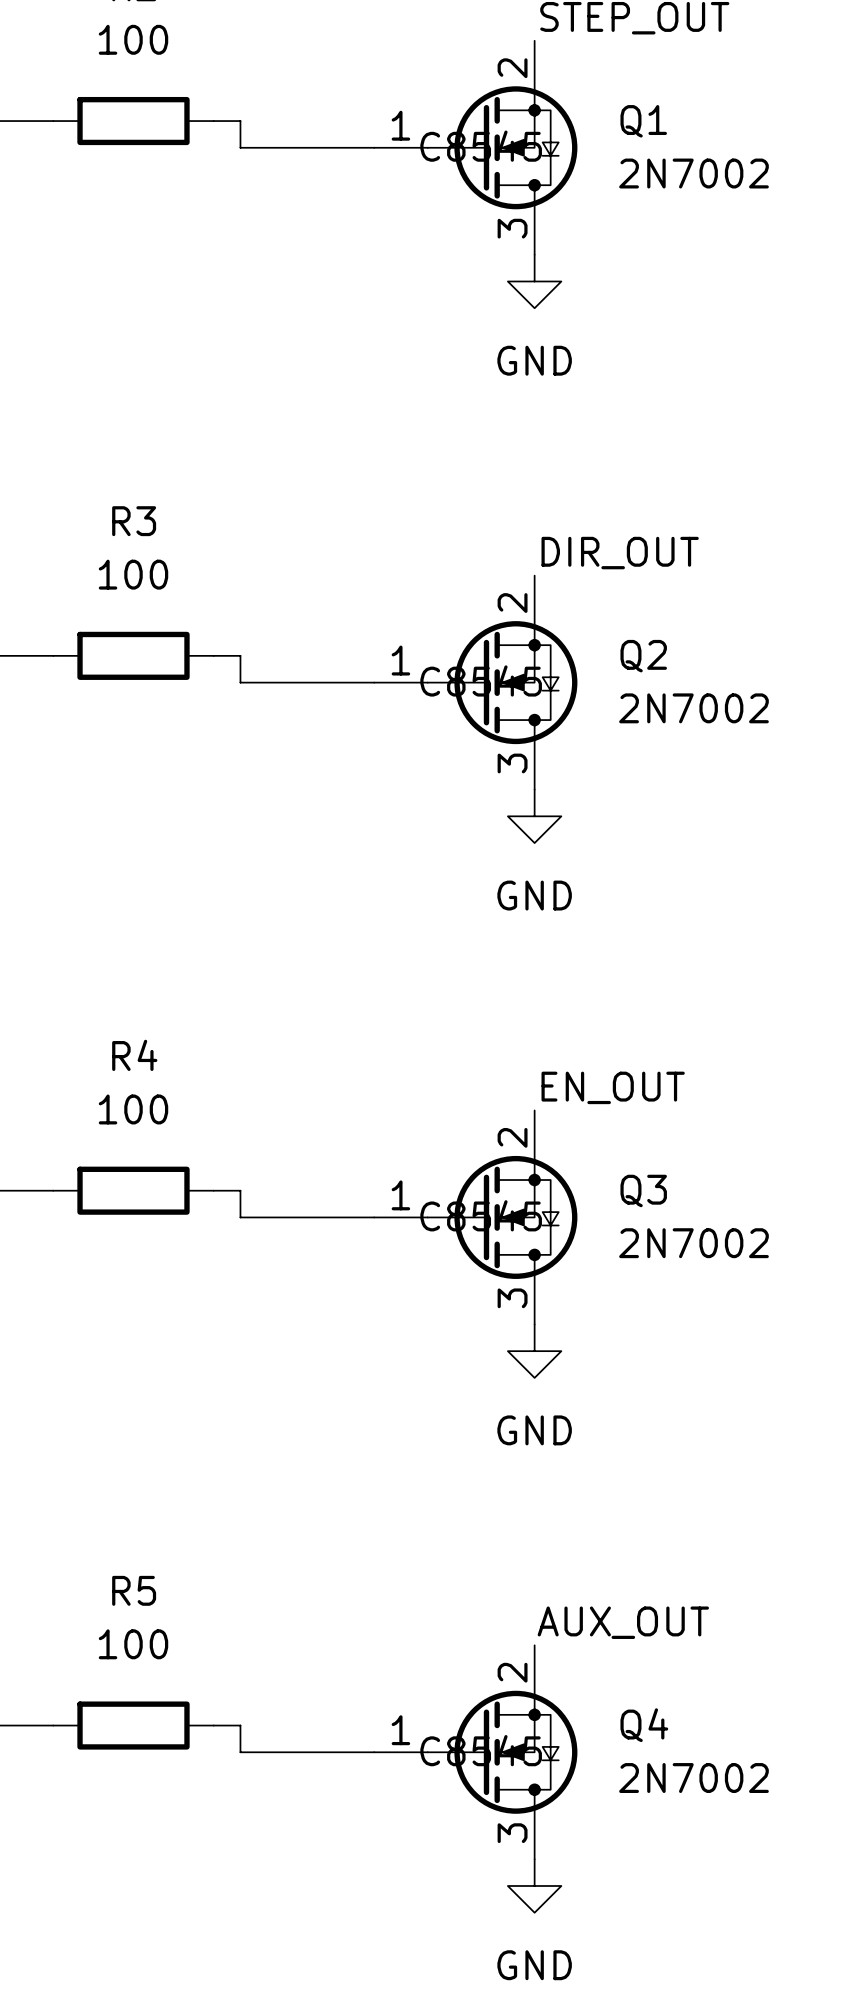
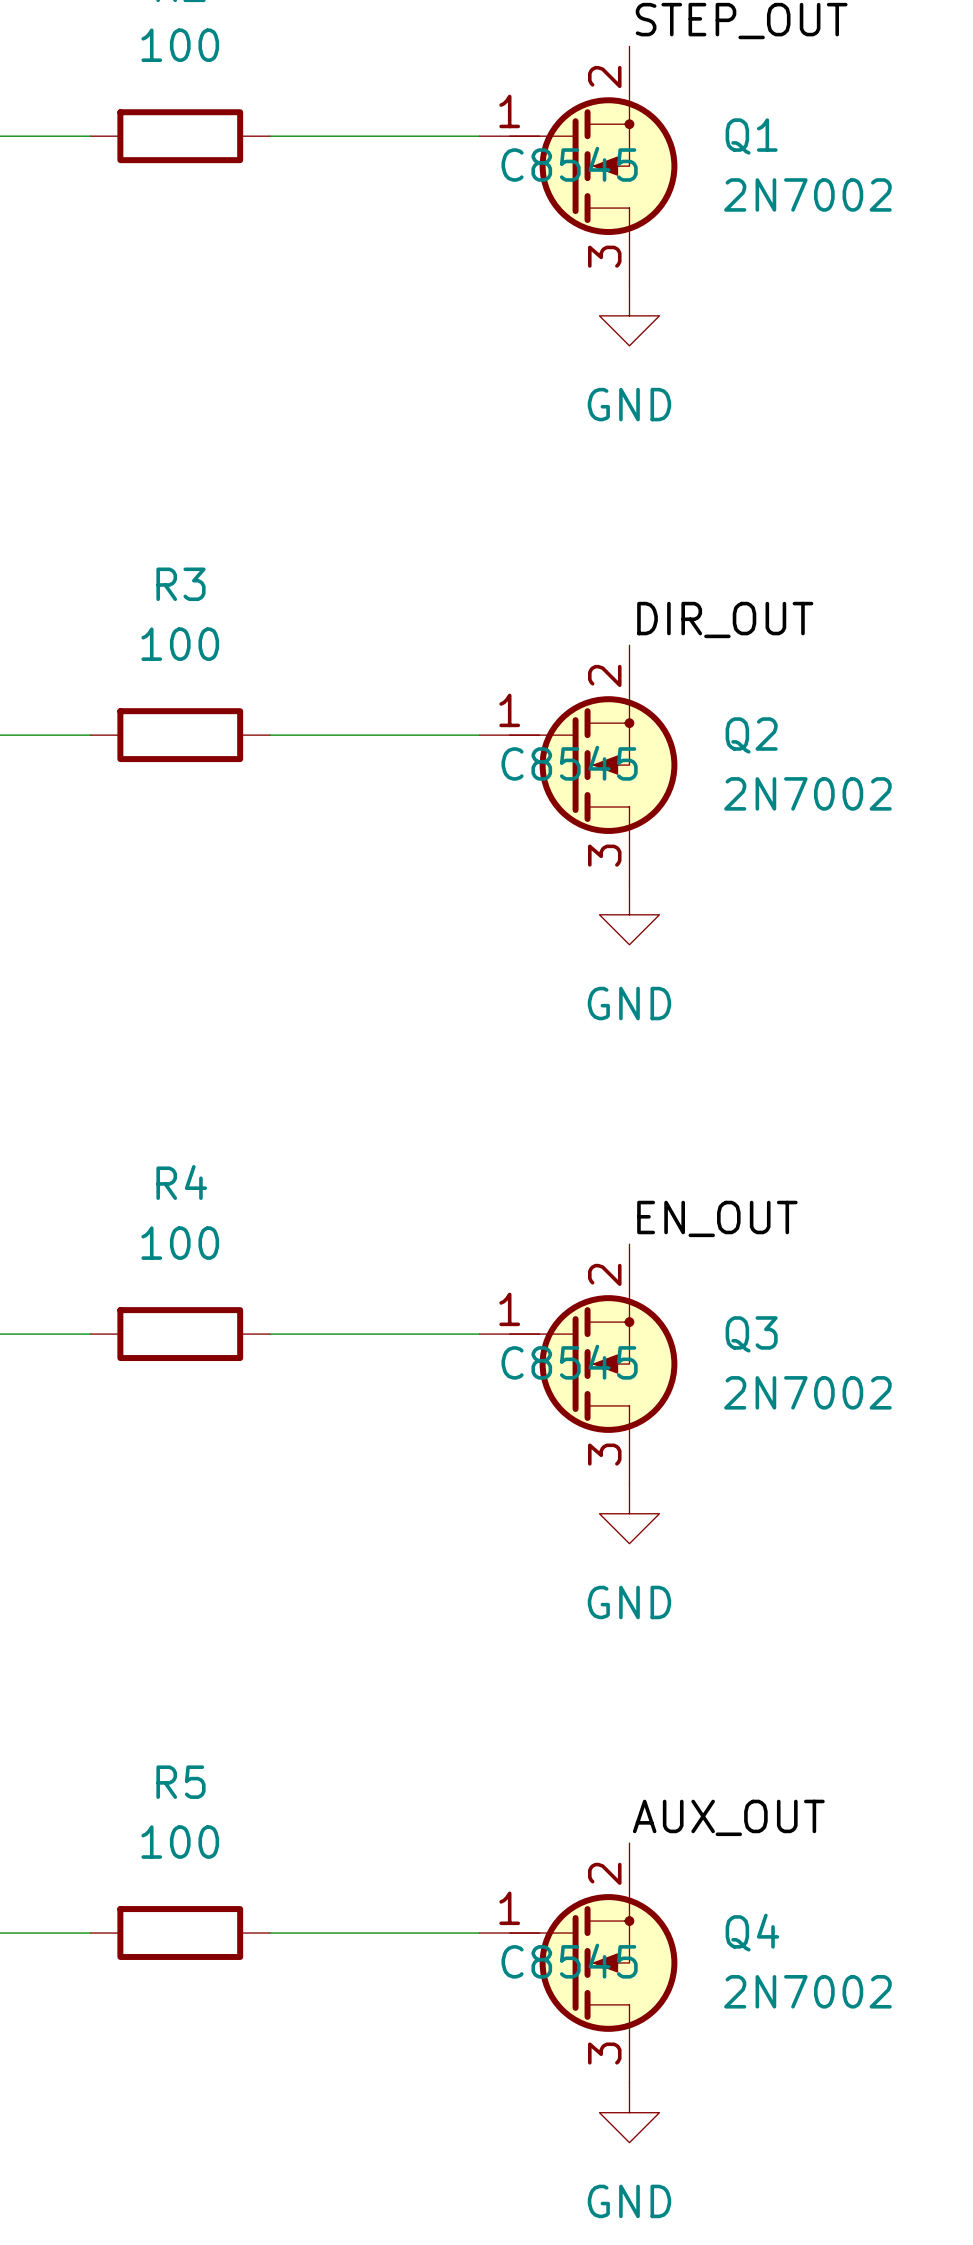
Q1 symbol: [374, 40, 578, 255] -> [479, 46, 678, 286]
wire: (240, 121) (240, 147) (374, 147) -> (300, 136) (479, 136)
Q2 symbol: [374, 575, 578, 790] -> [479, 645, 678, 885]
wire: (240, 655) (240, 682) (374, 682) -> (300, 735) (479, 735)
Q3 symbol: [374, 1110, 578, 1325] -> [479, 1244, 678, 1484]
wire: (240, 1190) (240, 1217) (374, 1217) -> (300, 1334) (479, 1334)
Q4 symbol: [374, 1645, 578, 1860] -> [479, 1843, 678, 2083]
wire: (240, 1725) (240, 1752) (374, 1752) -> (300, 1933) (479, 1933)

